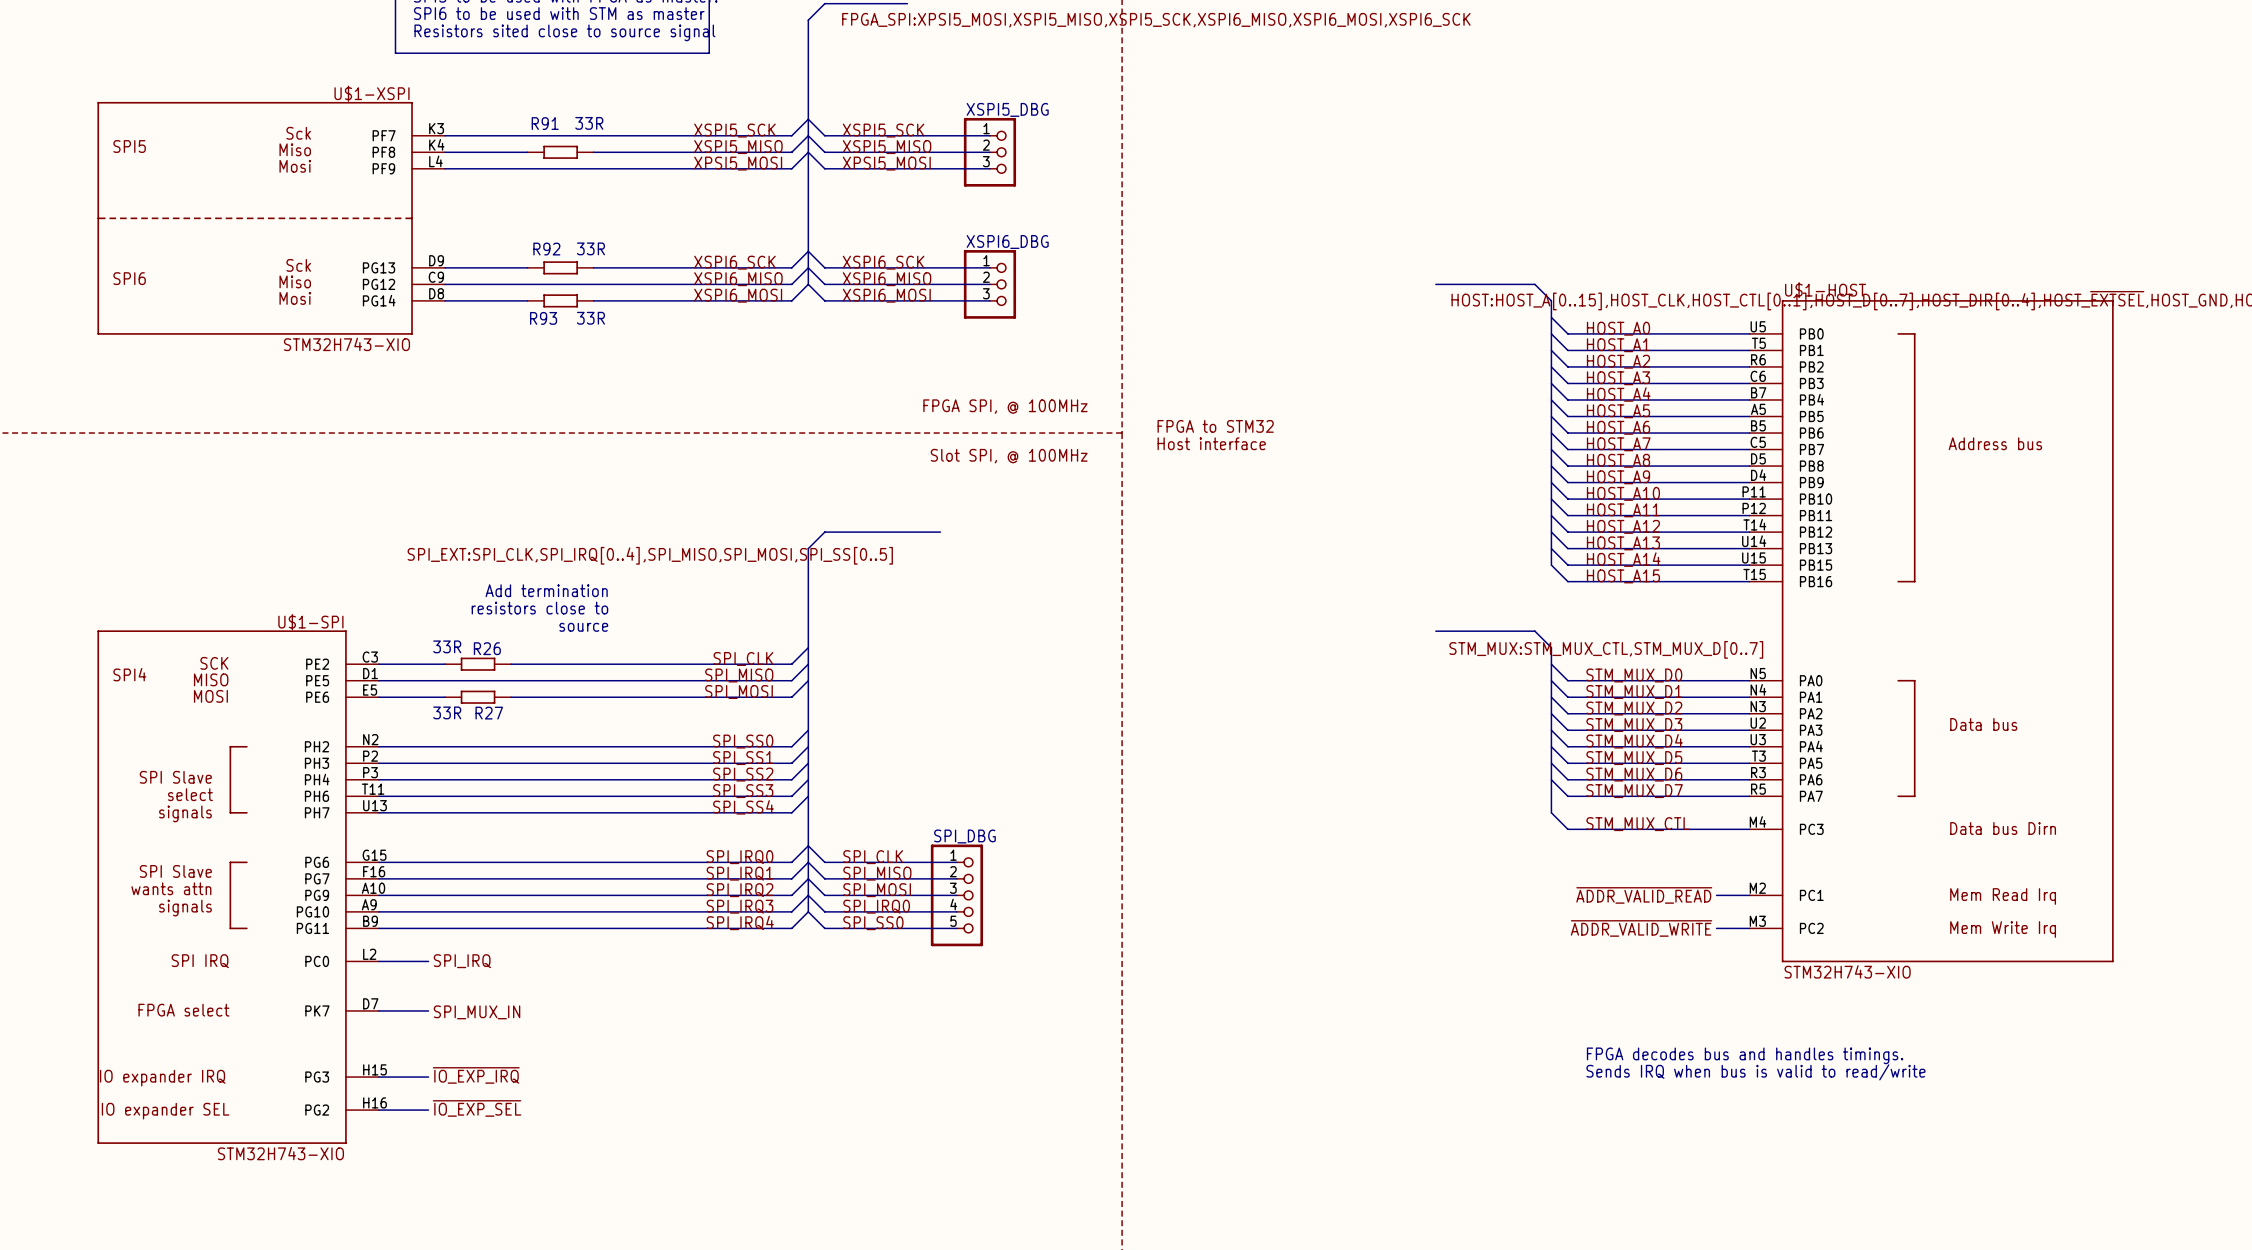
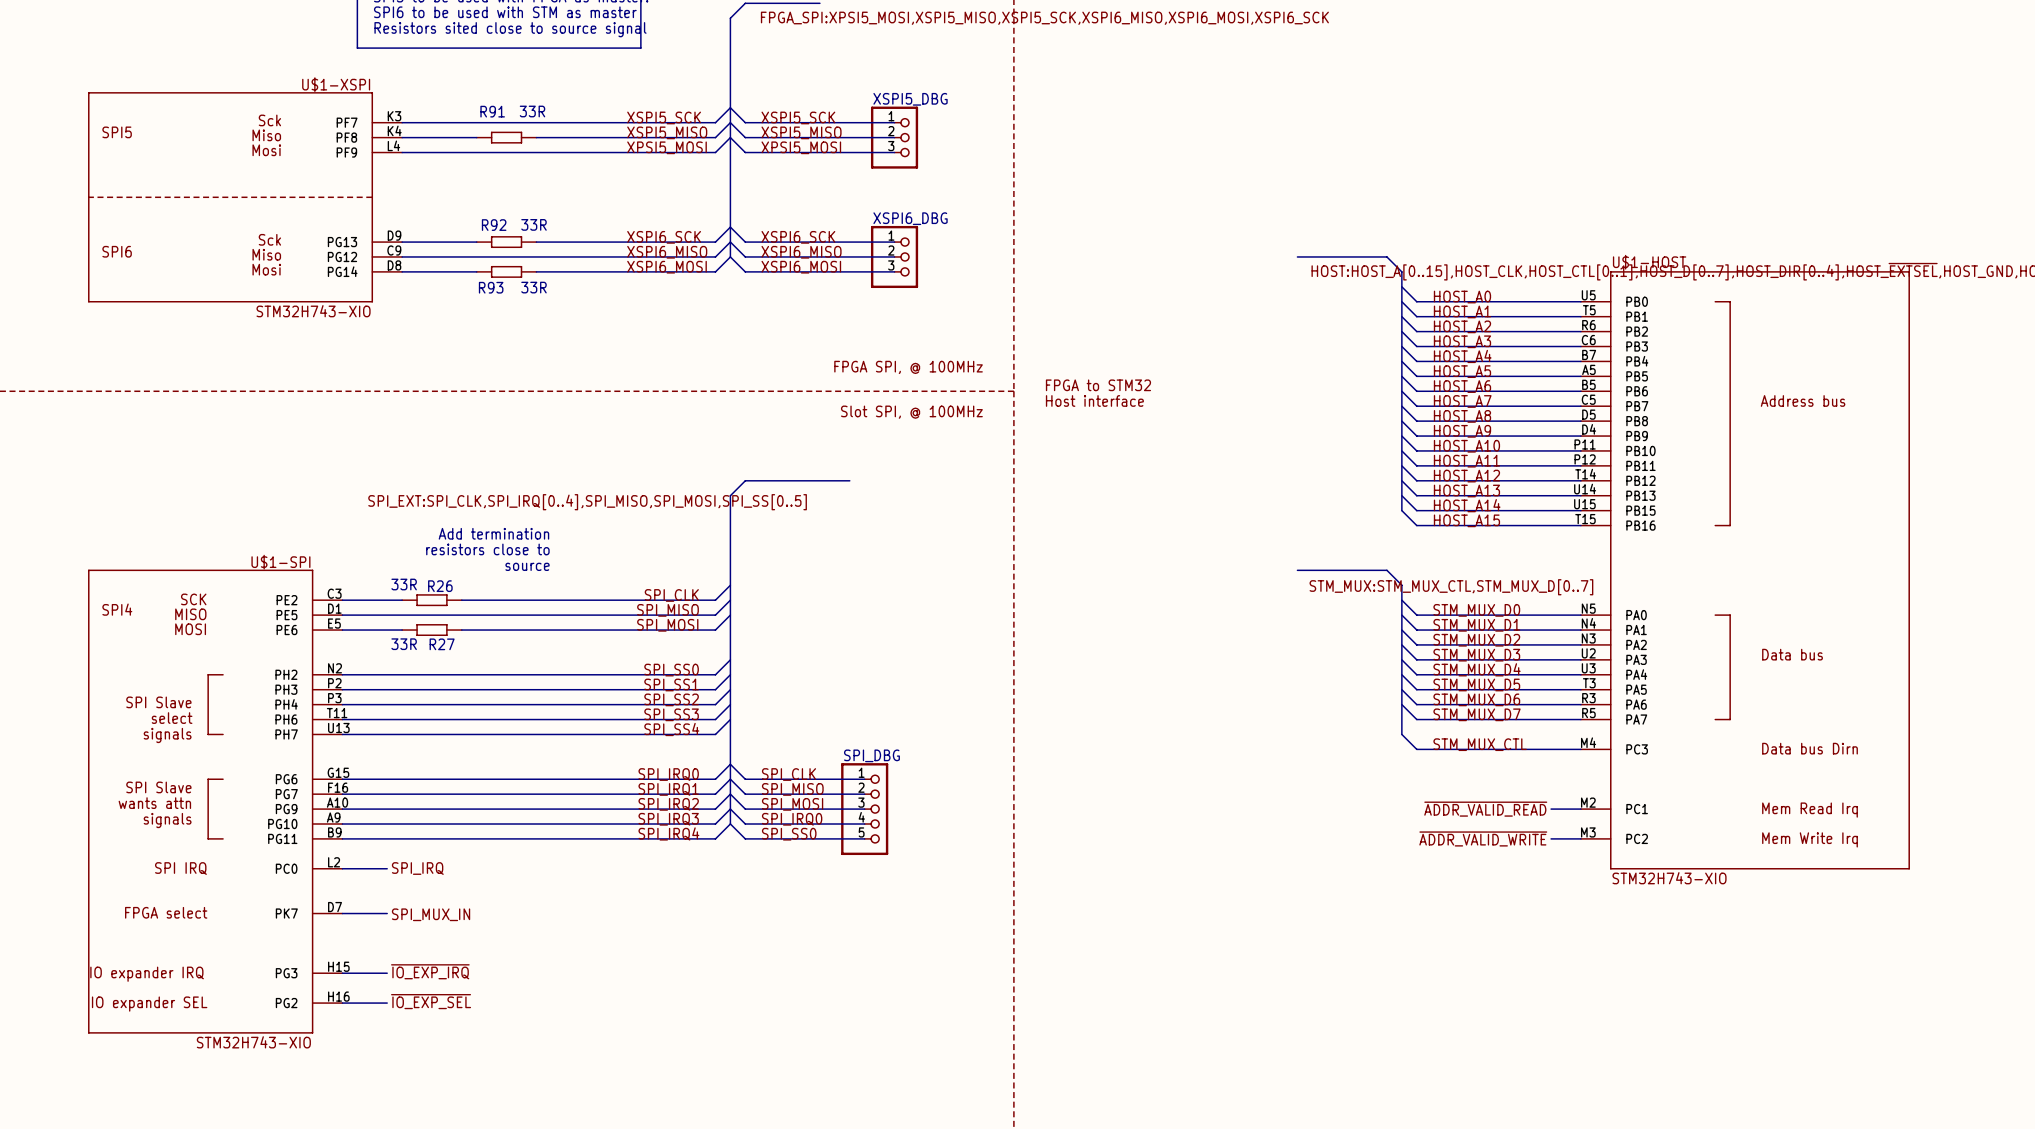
text: FPGA decodes bus and handles timings. (1745, 1055) -> none
text: Sends IRQ when bus is valid to read/write (1755, 1072) -> none

